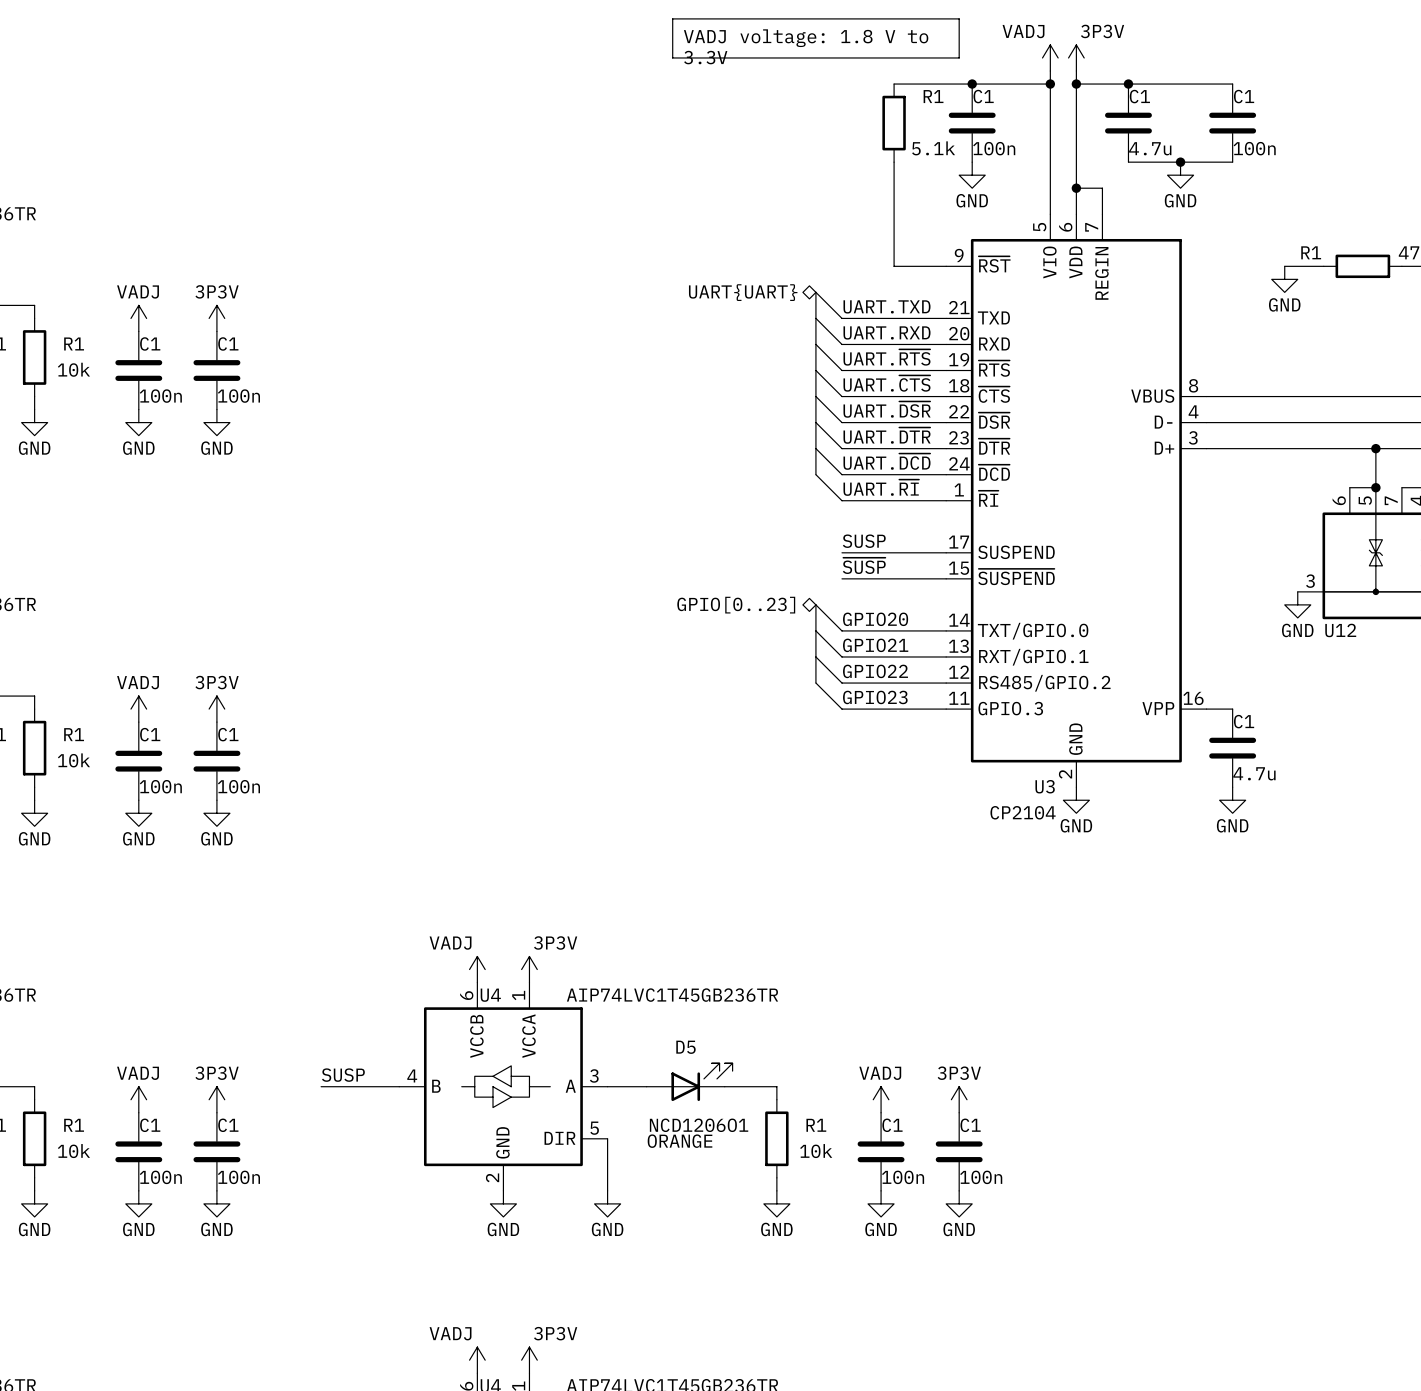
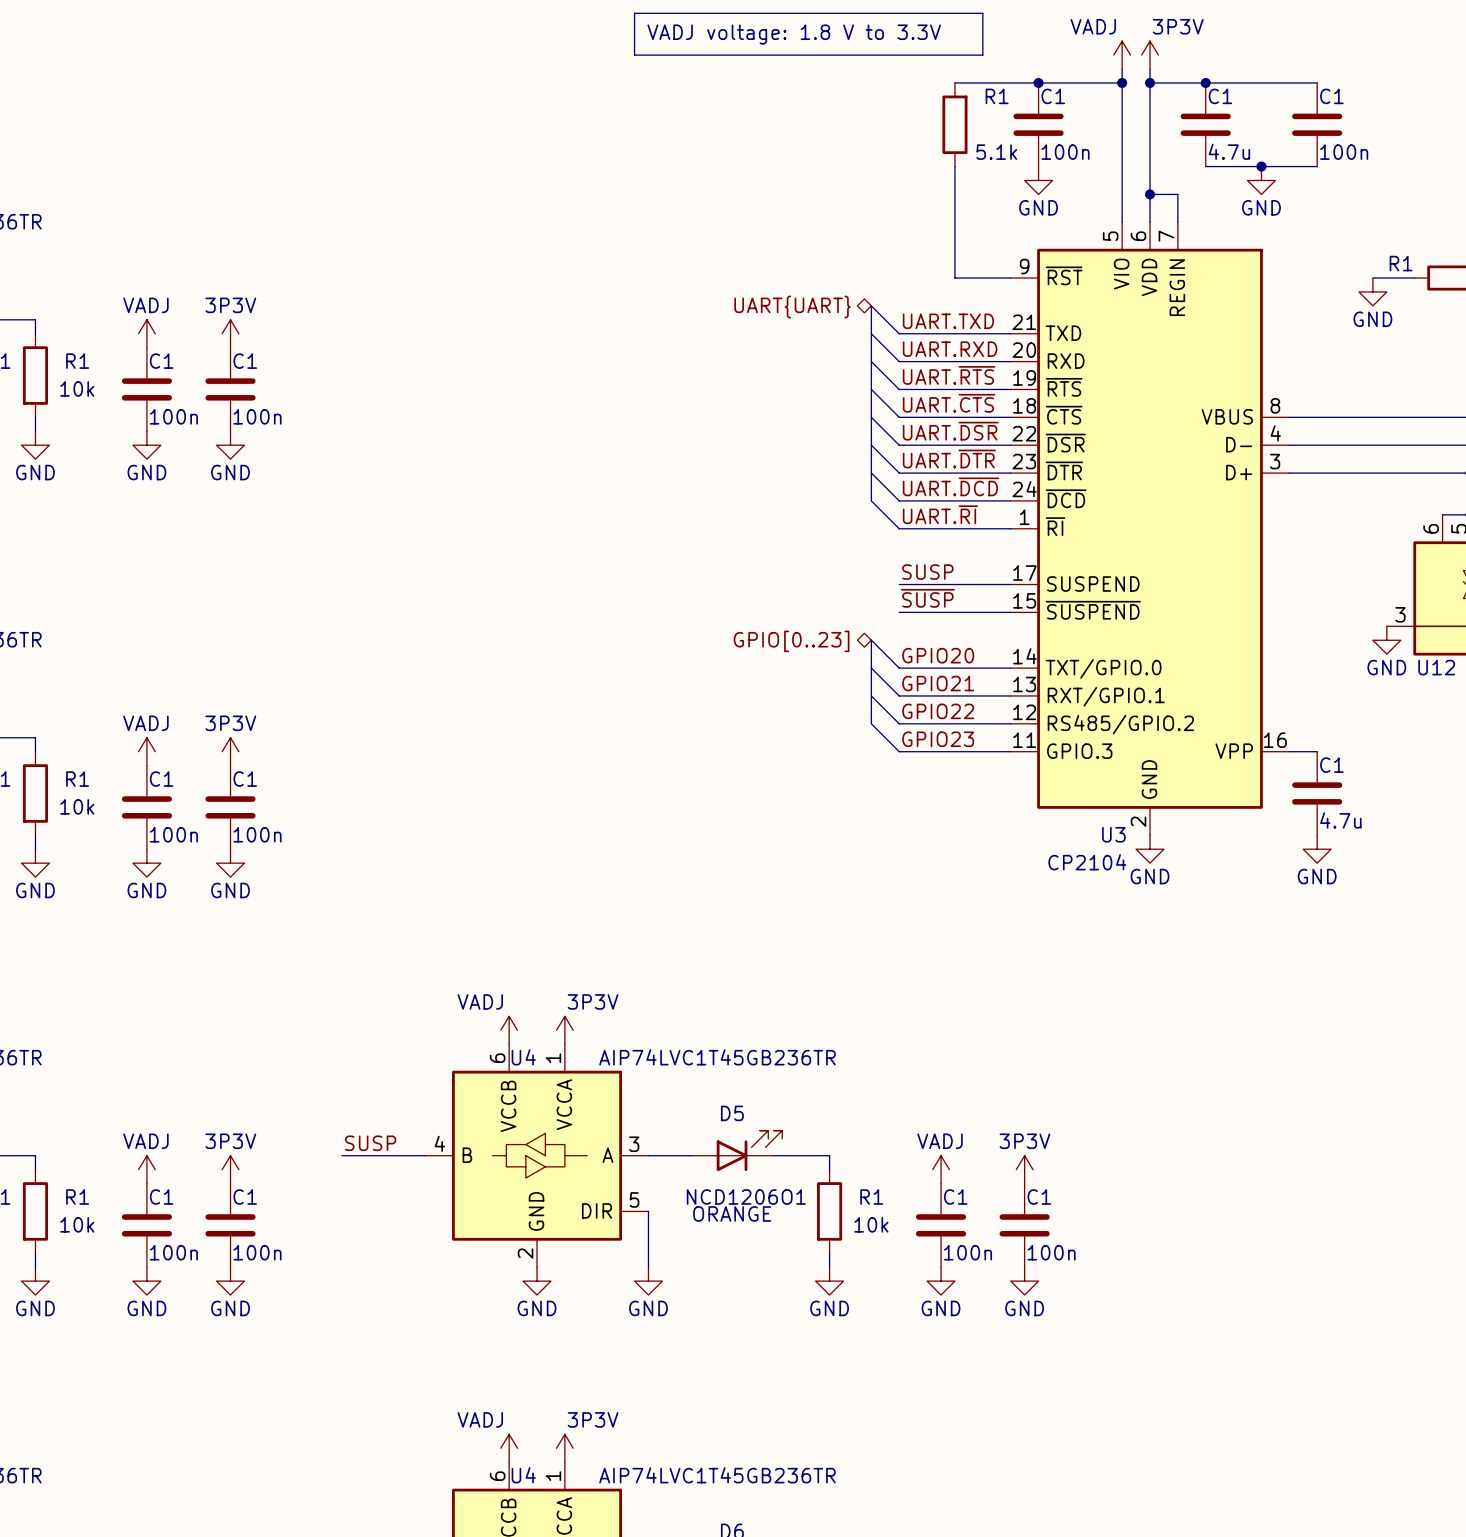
line: (672, 18) (672, 57) -> (718, 13) (634, 13) (634, 55) (718, 55)
line: (920, 18) (959, 18) (959, 57) (920, 57) -> (982, 13) (982, 55)
text: VADJ voltage: 1.8 V to (806, 38) -> VADJ voltage: 1.8 V to 3.3V (794, 34)
text: 3.3V (705, 57) -> none

